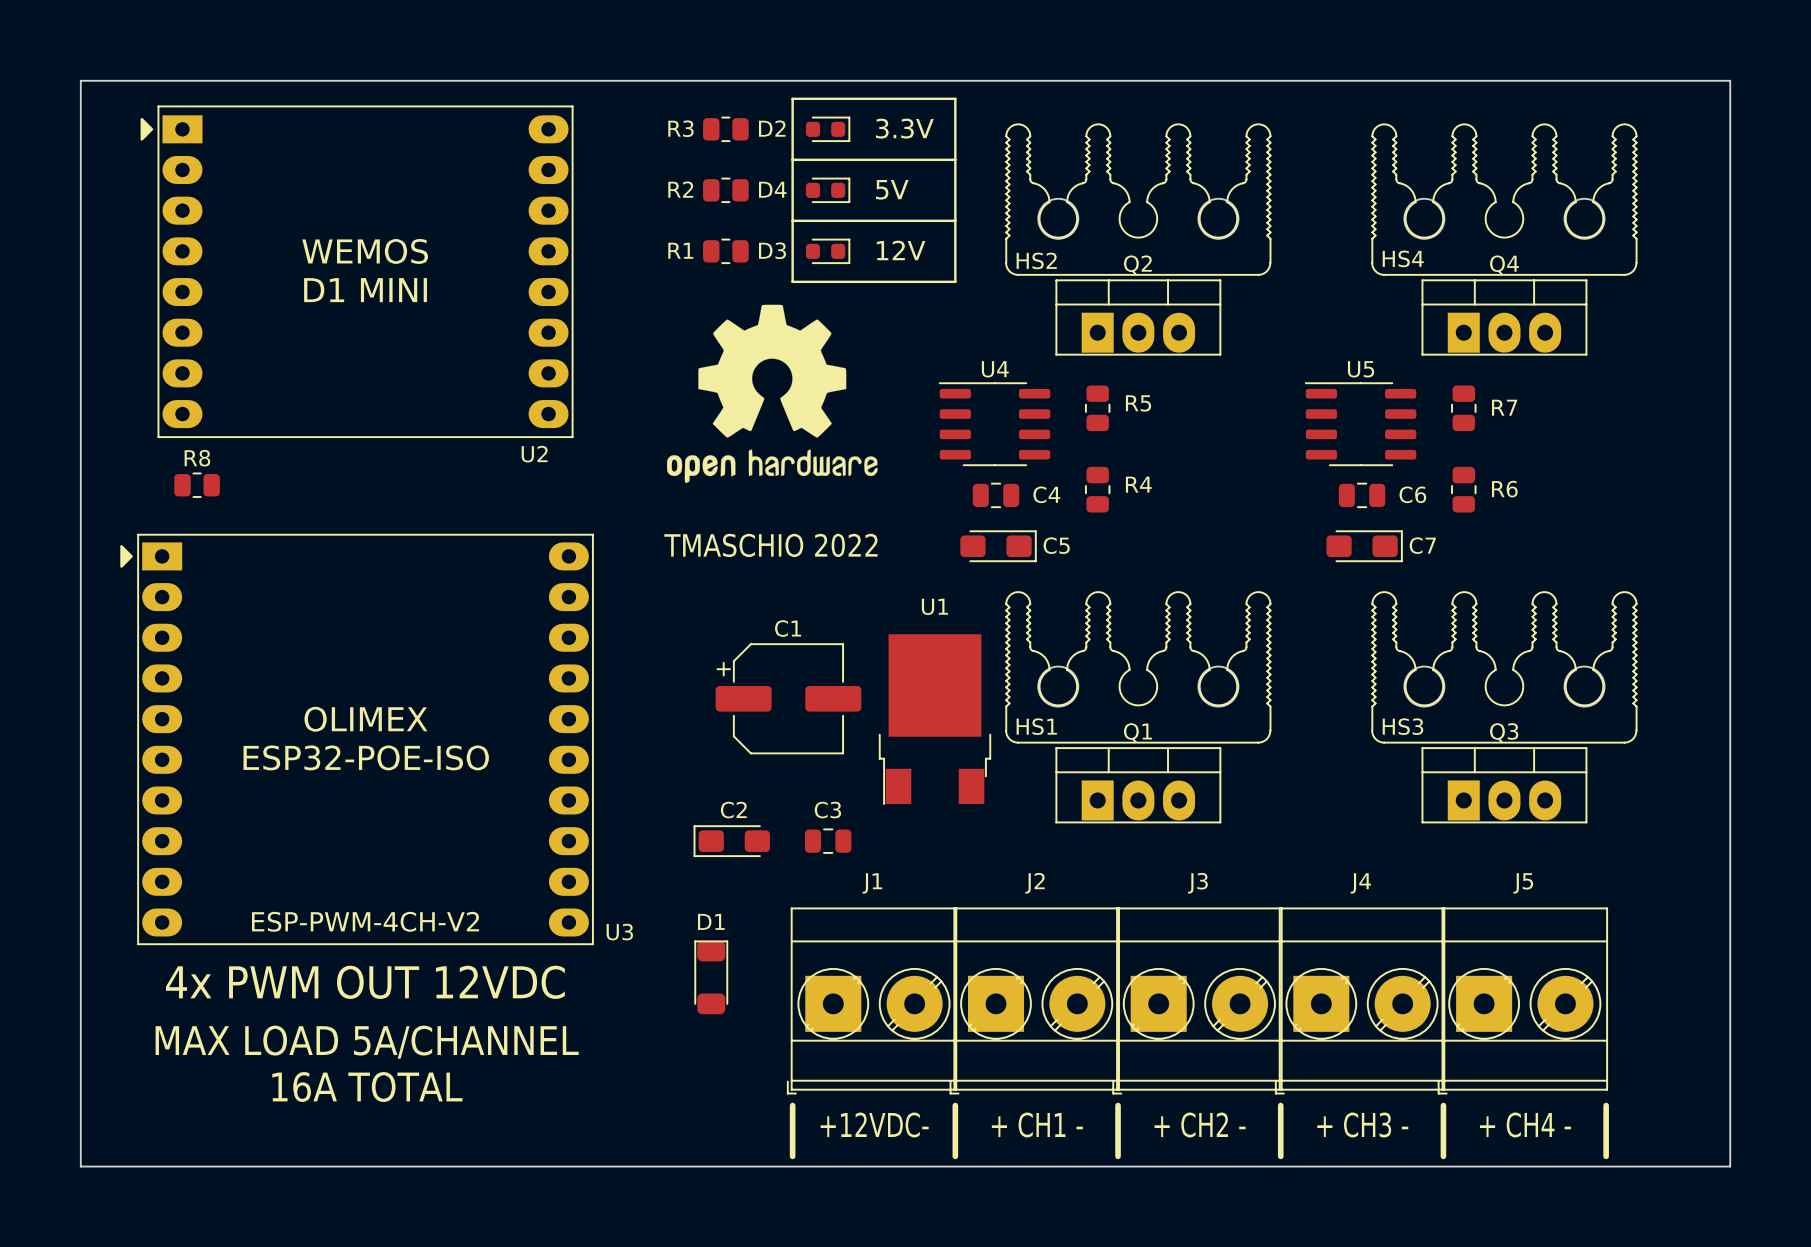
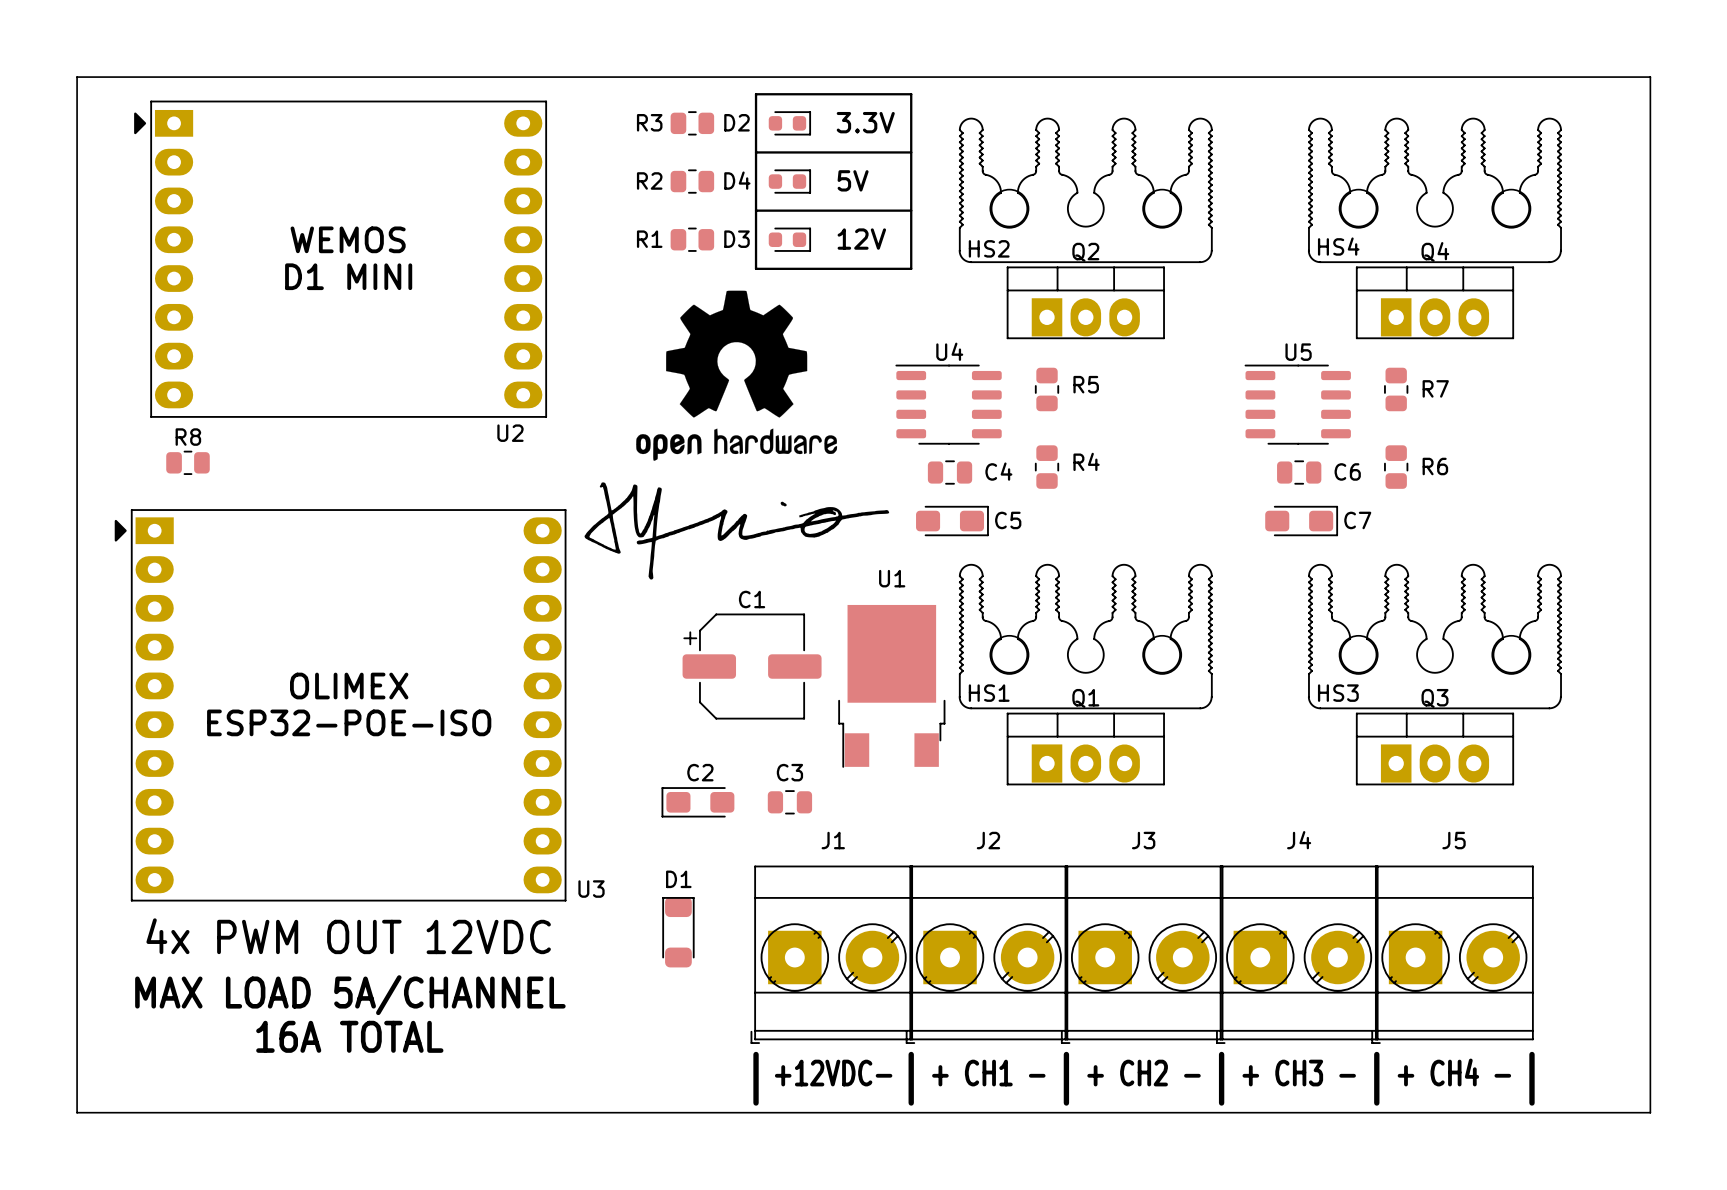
drawing: none -> [584, 482, 890, 580]
text: TMASCHIO 2022 (770, 545) -> none
text: ESP-PWM-4CH-V2 (365, 921) -> none

